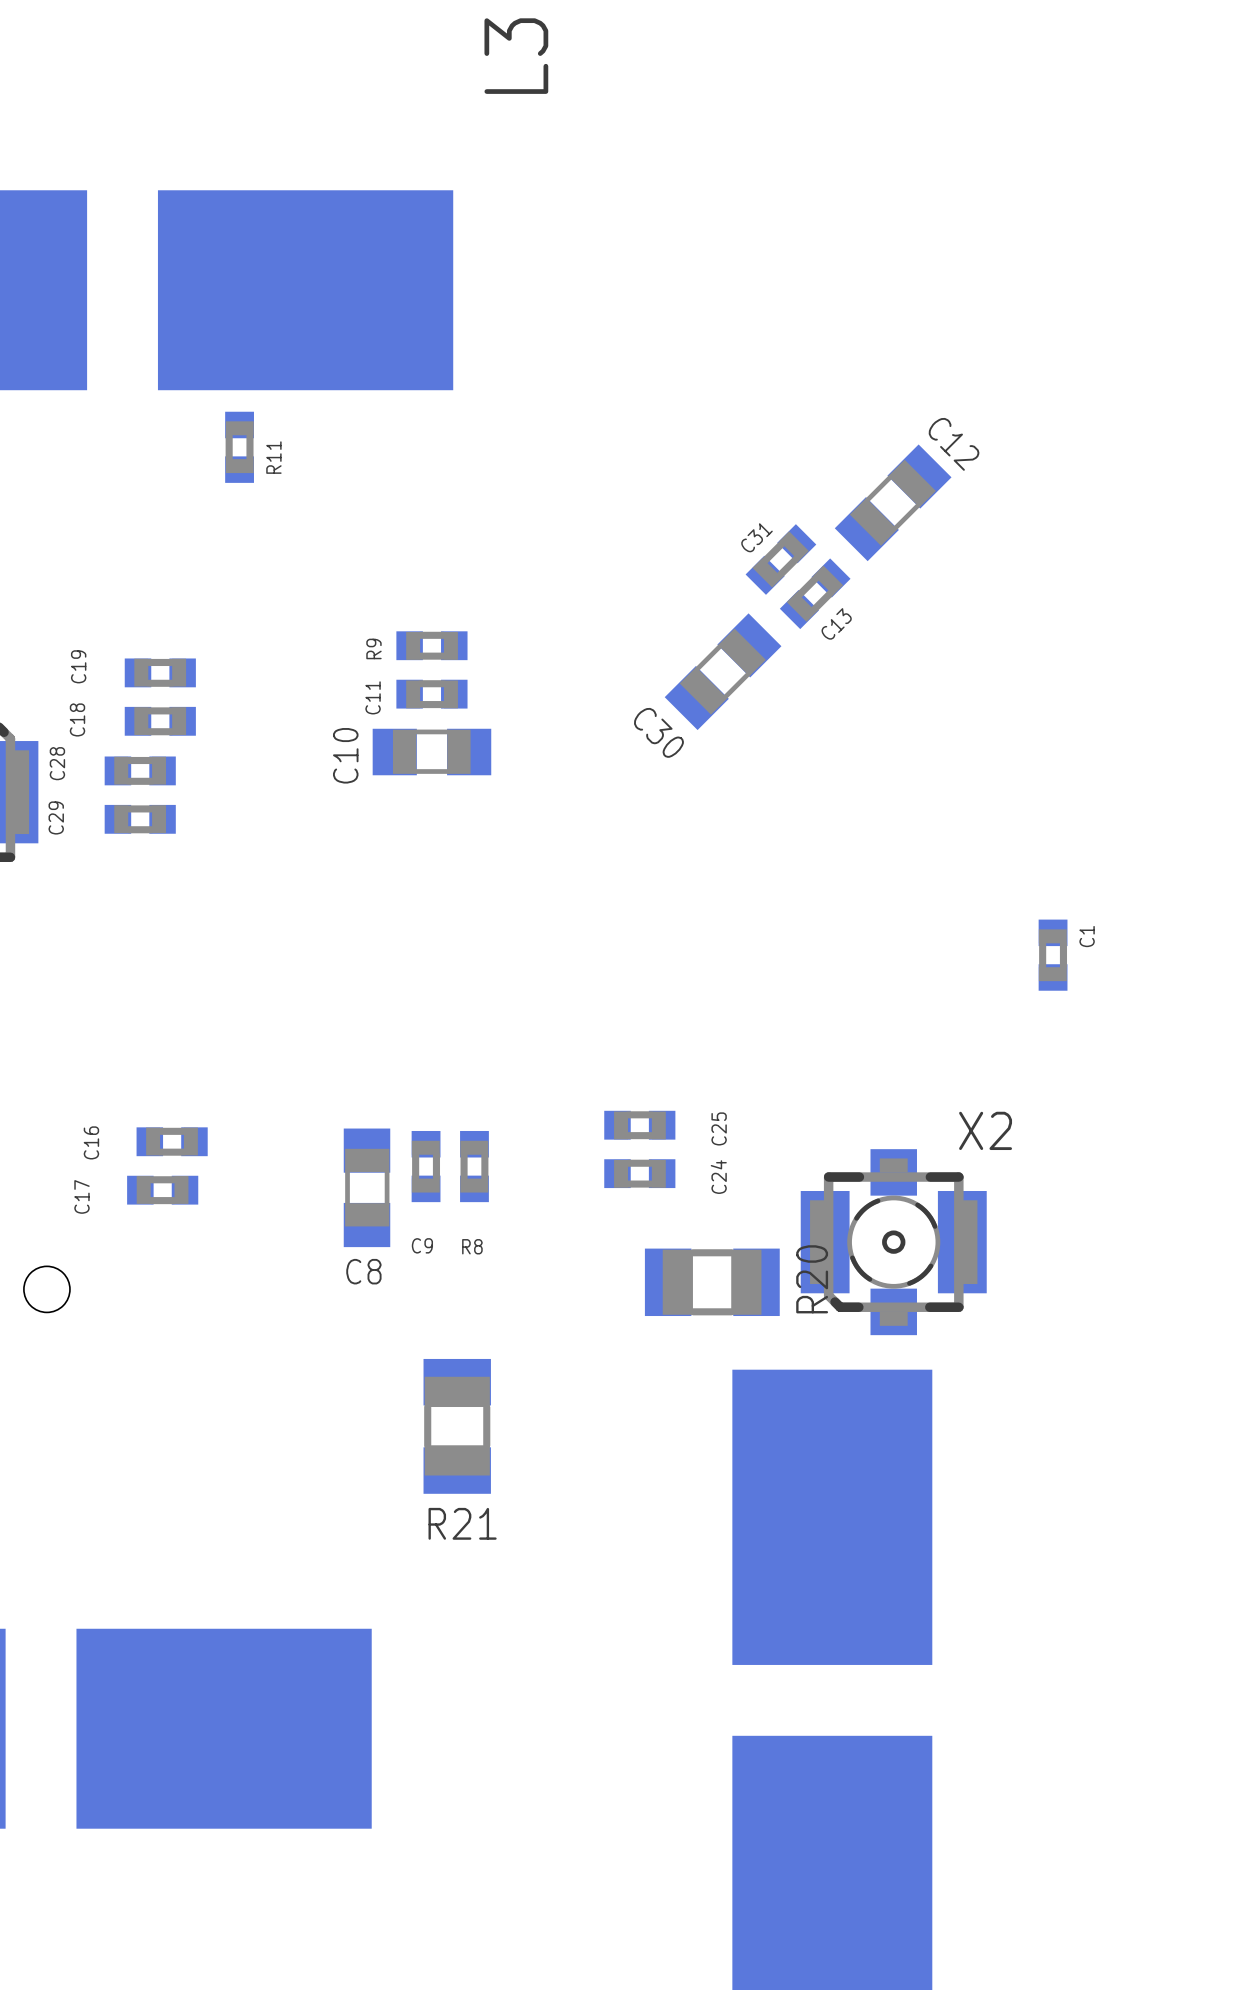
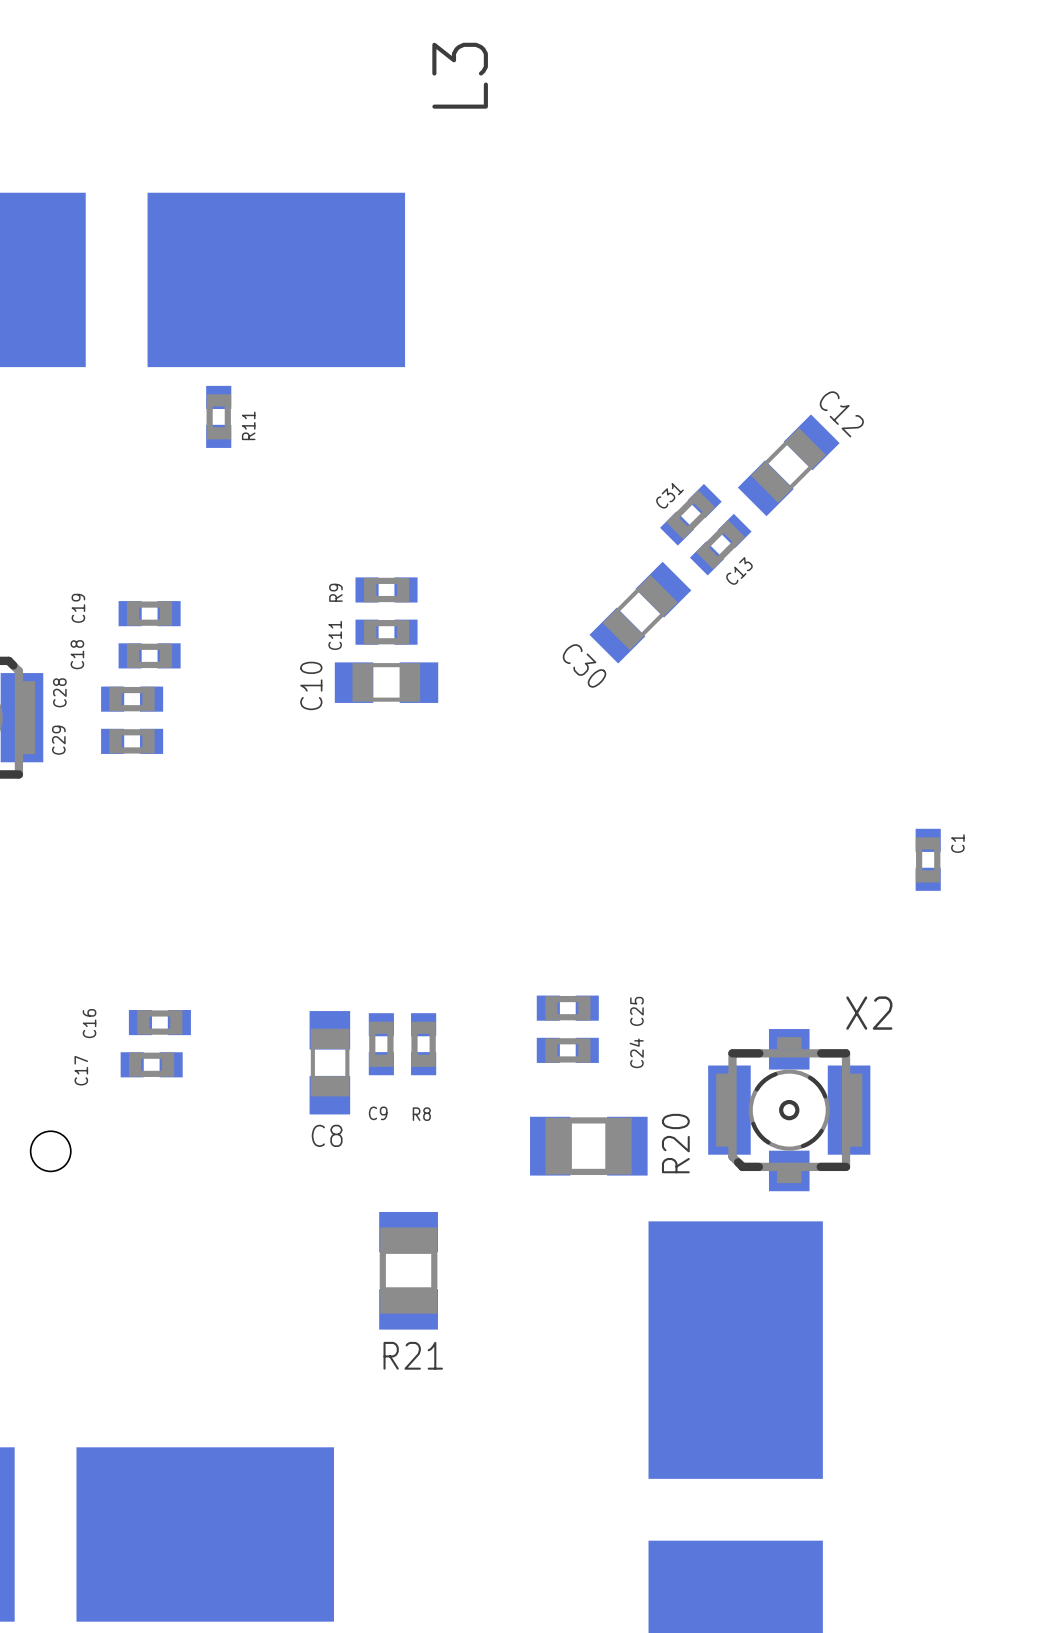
R20 position: (712, 1282) -> (588, 1146)

